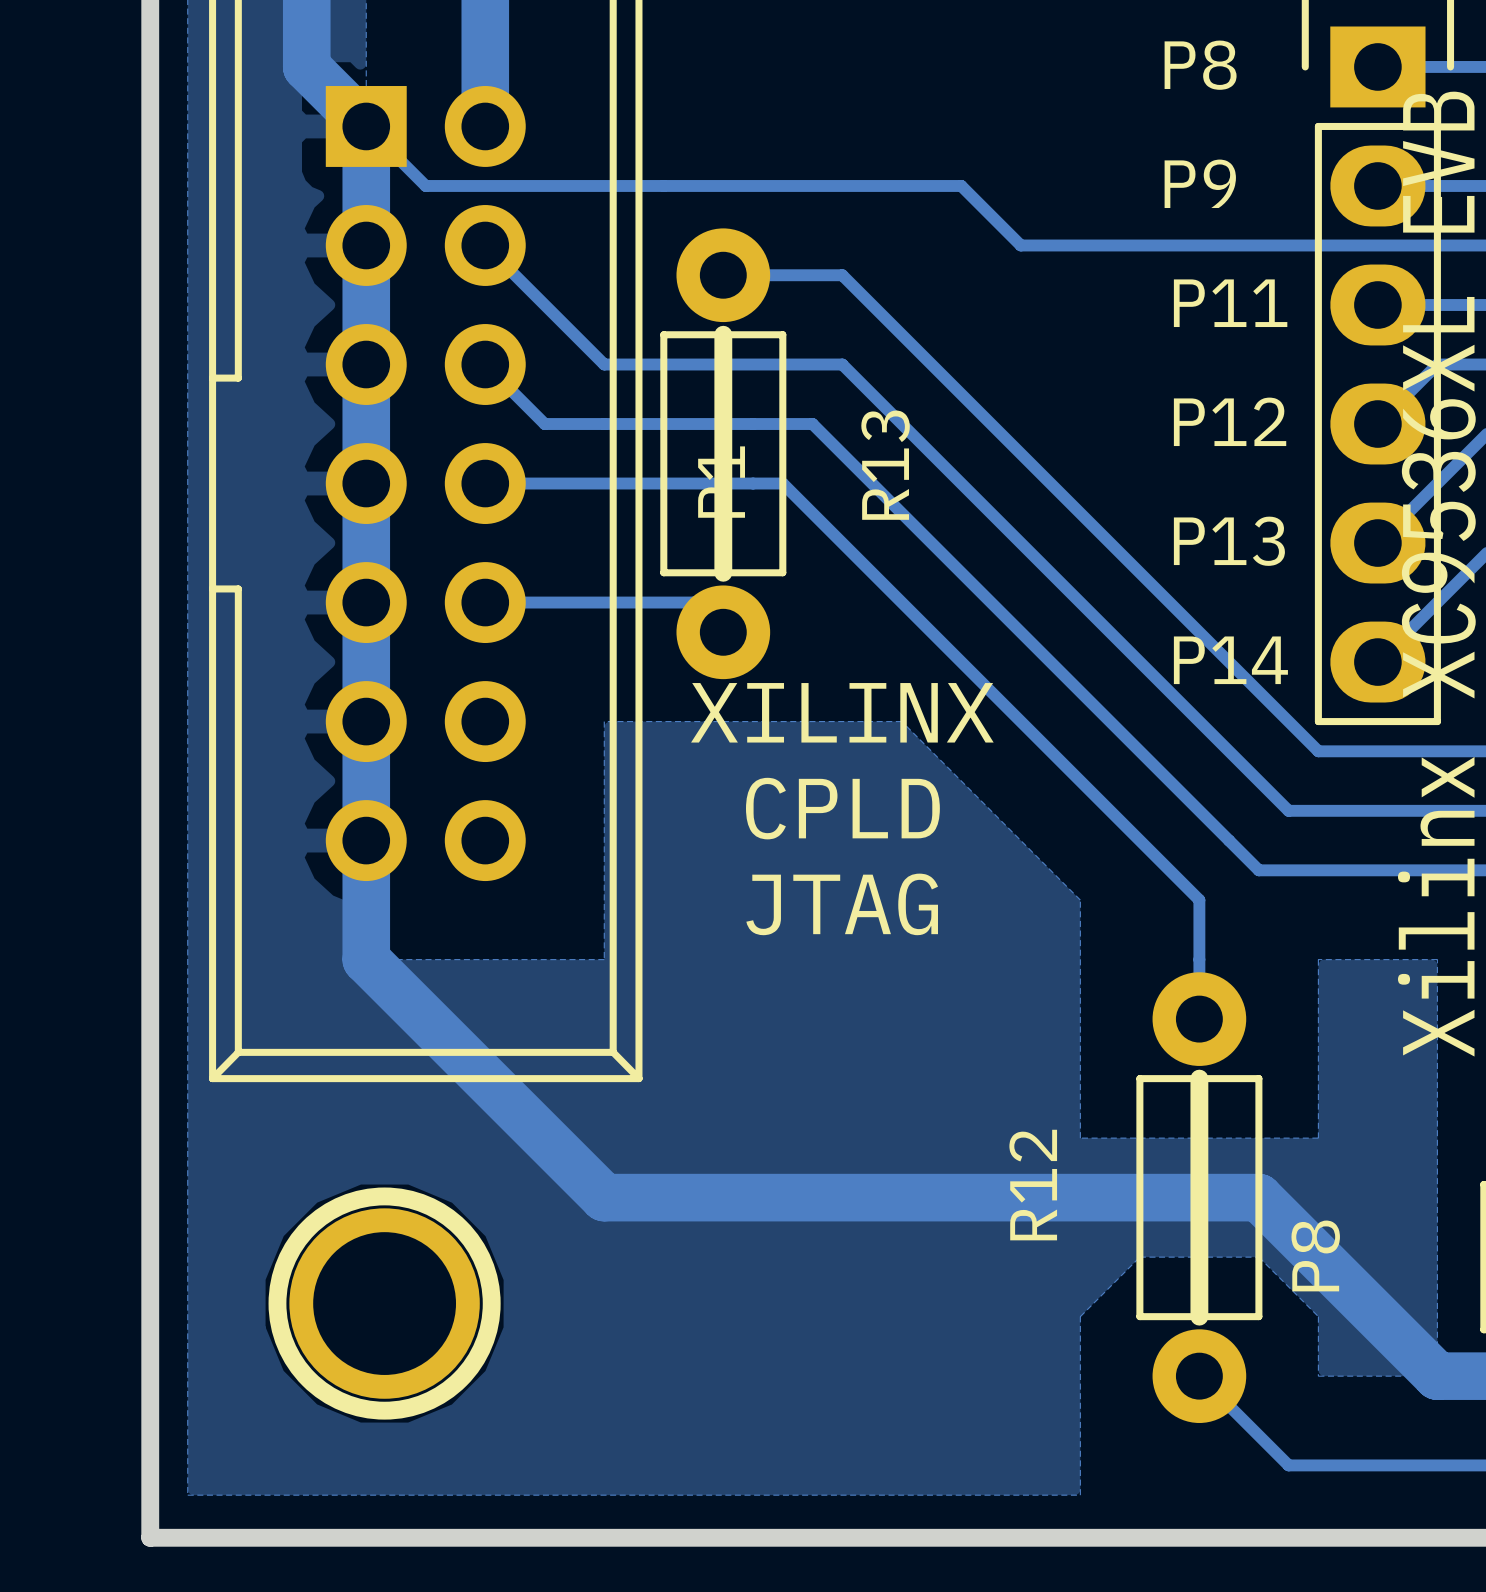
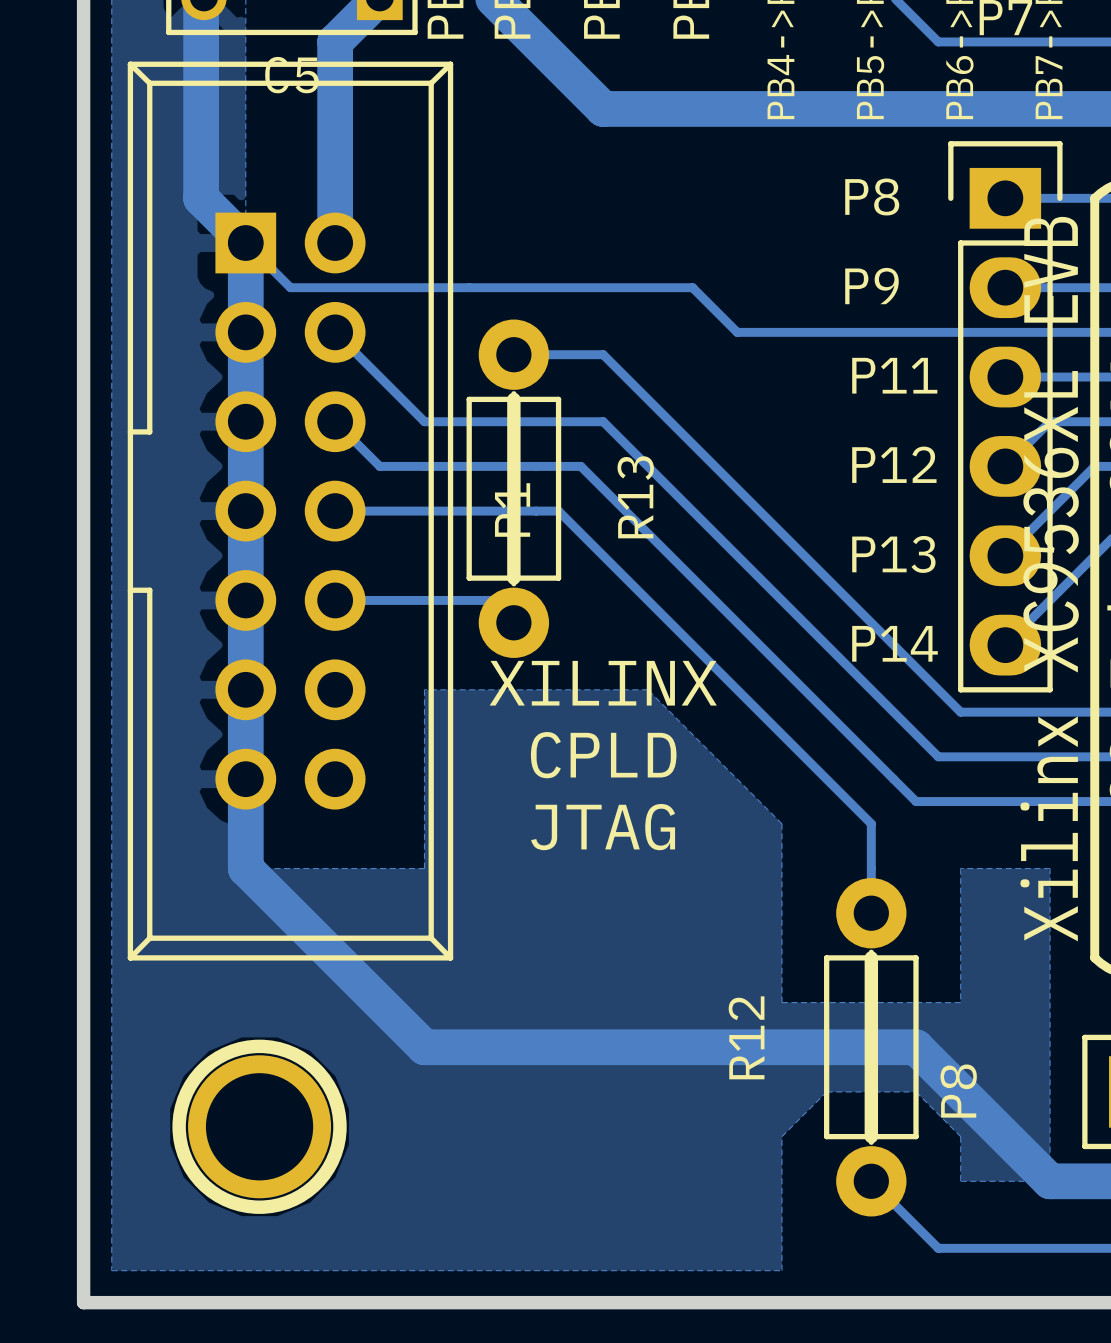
R13 footprint: [660, 228, 787, 680] -> [466, 319, 562, 658]
R12 footprint: [1136, 972, 1263, 1423] -> [824, 878, 919, 1217]

